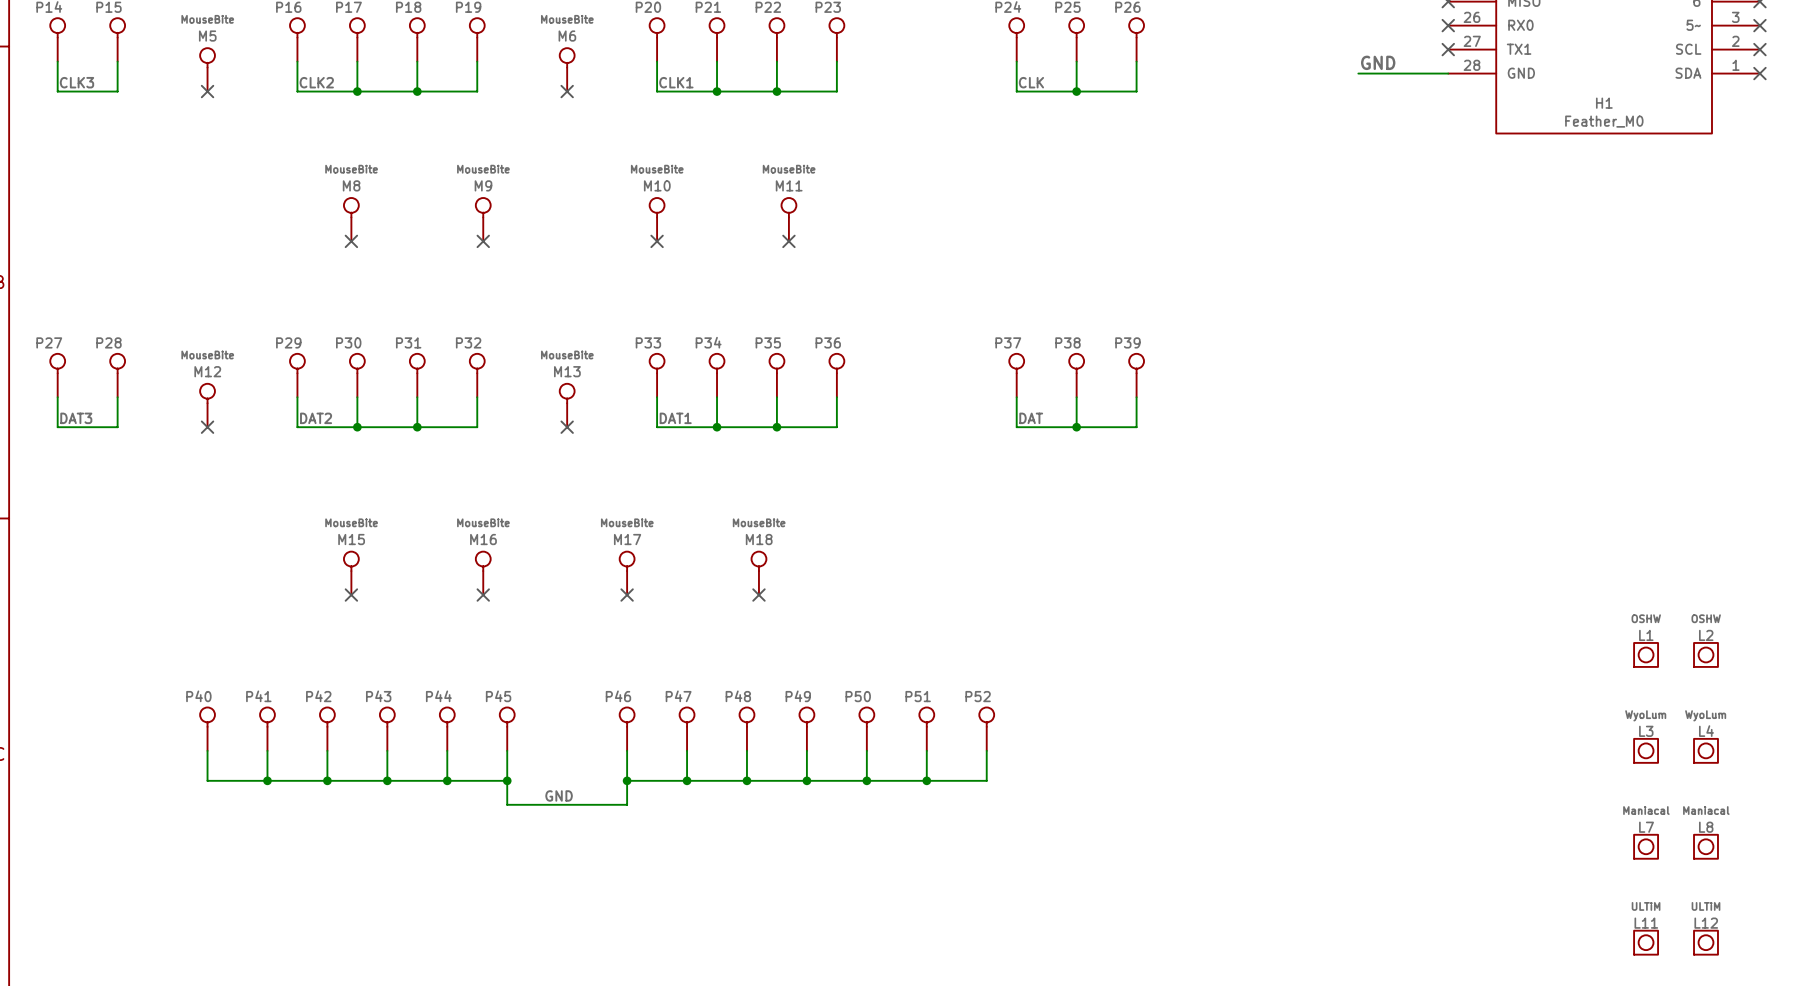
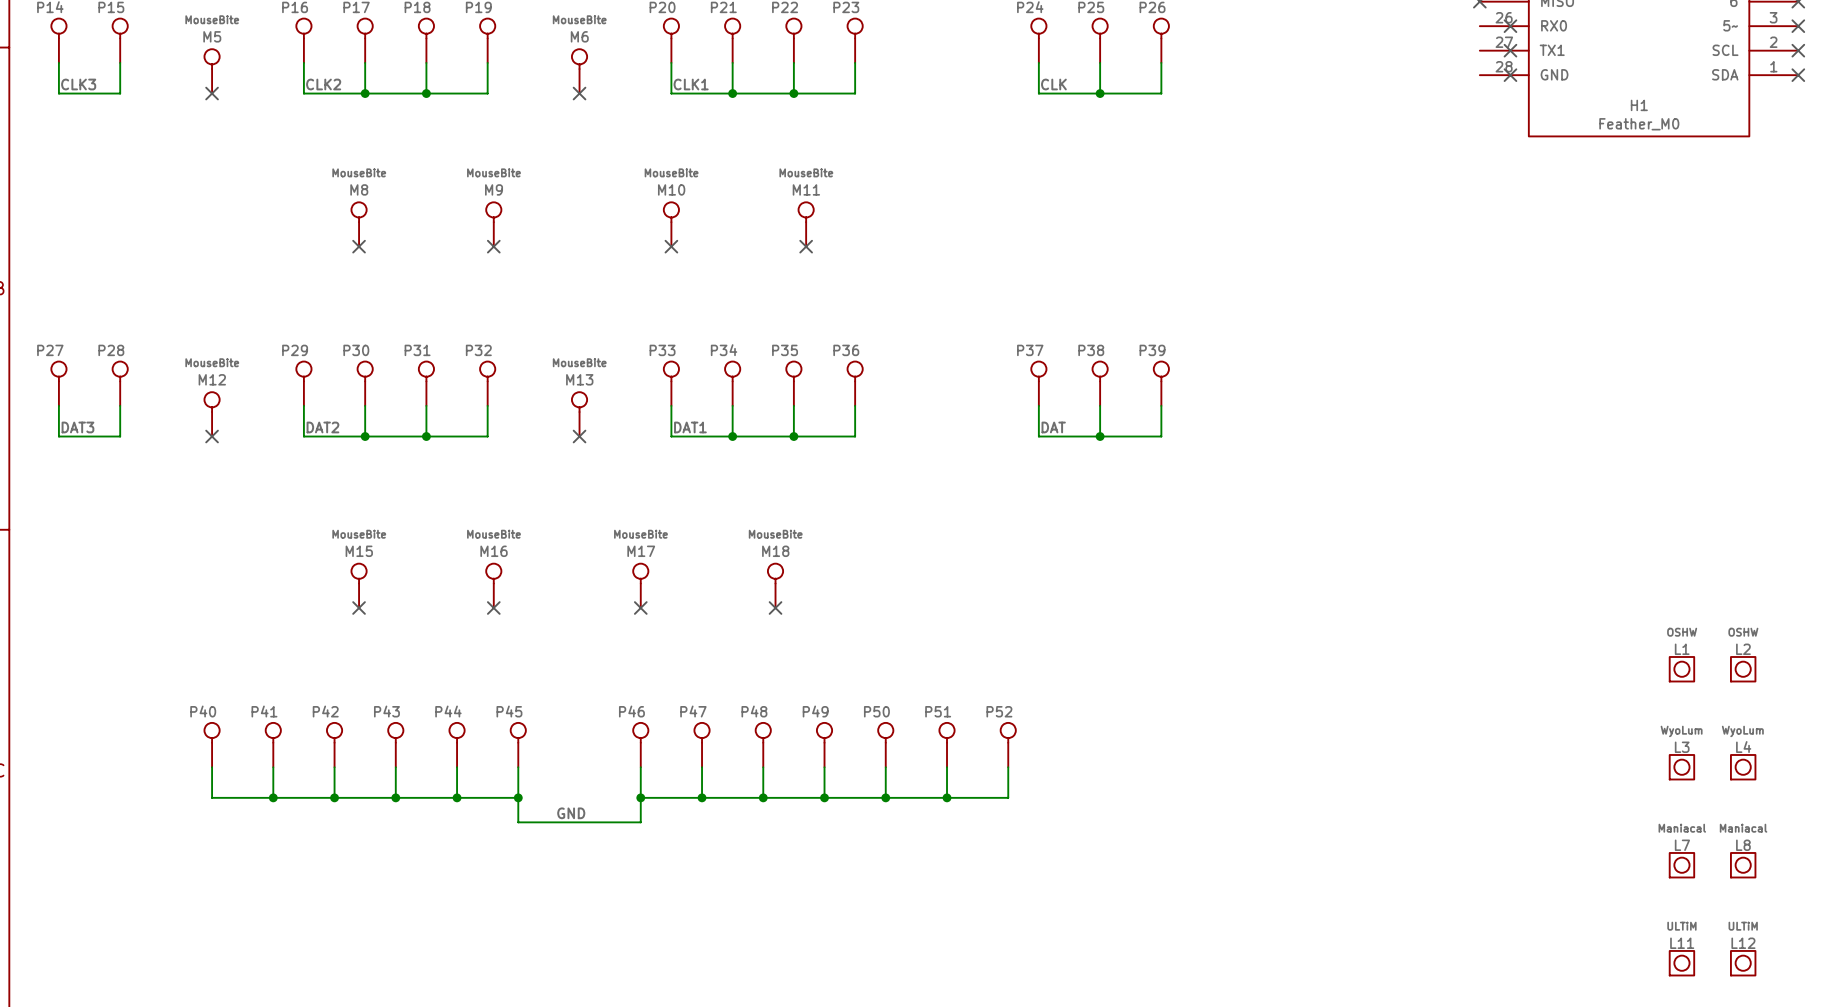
no-connect mark: (1448, 25) -> none
no-connect mark: none -> (1510, 26)
no-connect mark: (1448, 49) -> none
no-connect mark: none -> (1510, 50)
label: GND (1378, 62) -> none
wire: (1358, 73) (1448, 73) -> none
no-connect mark: none -> (1510, 75)

